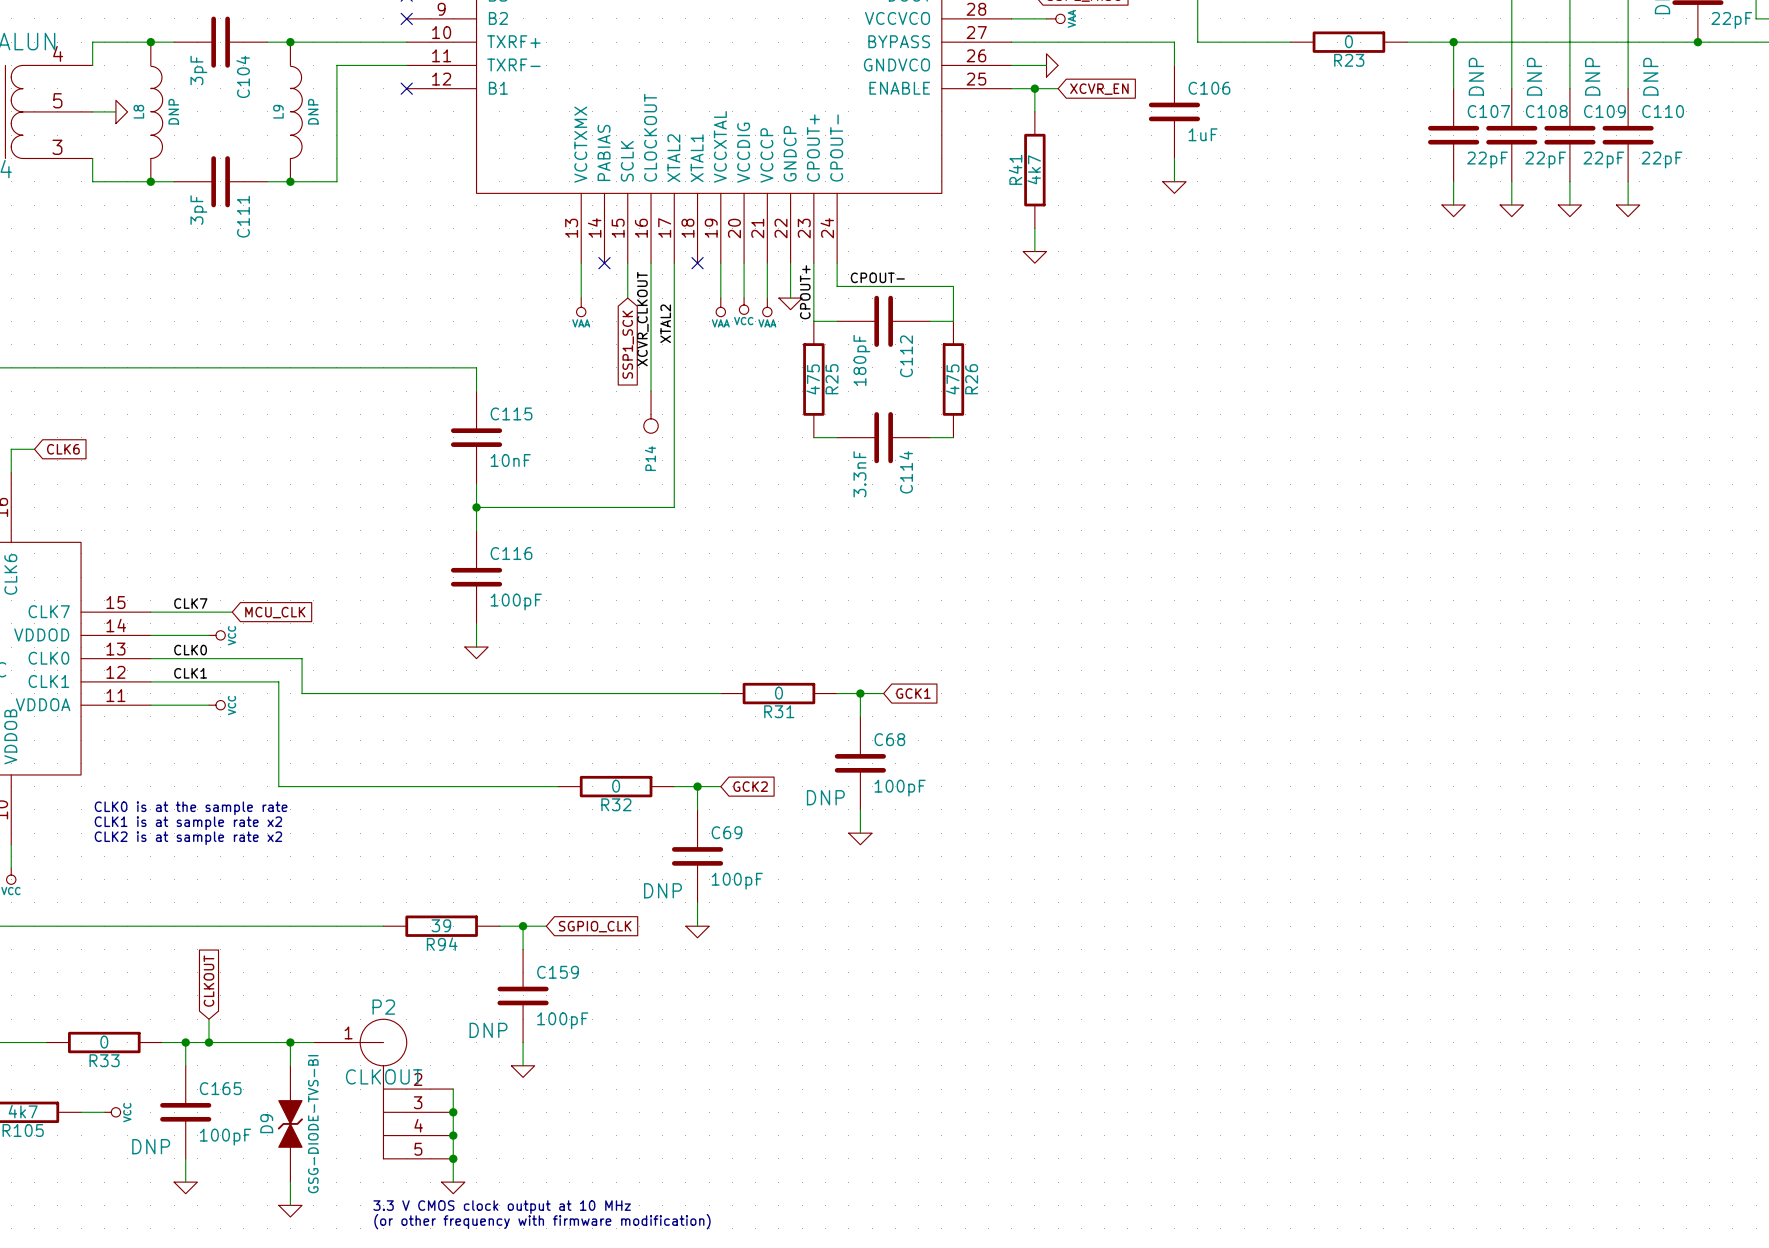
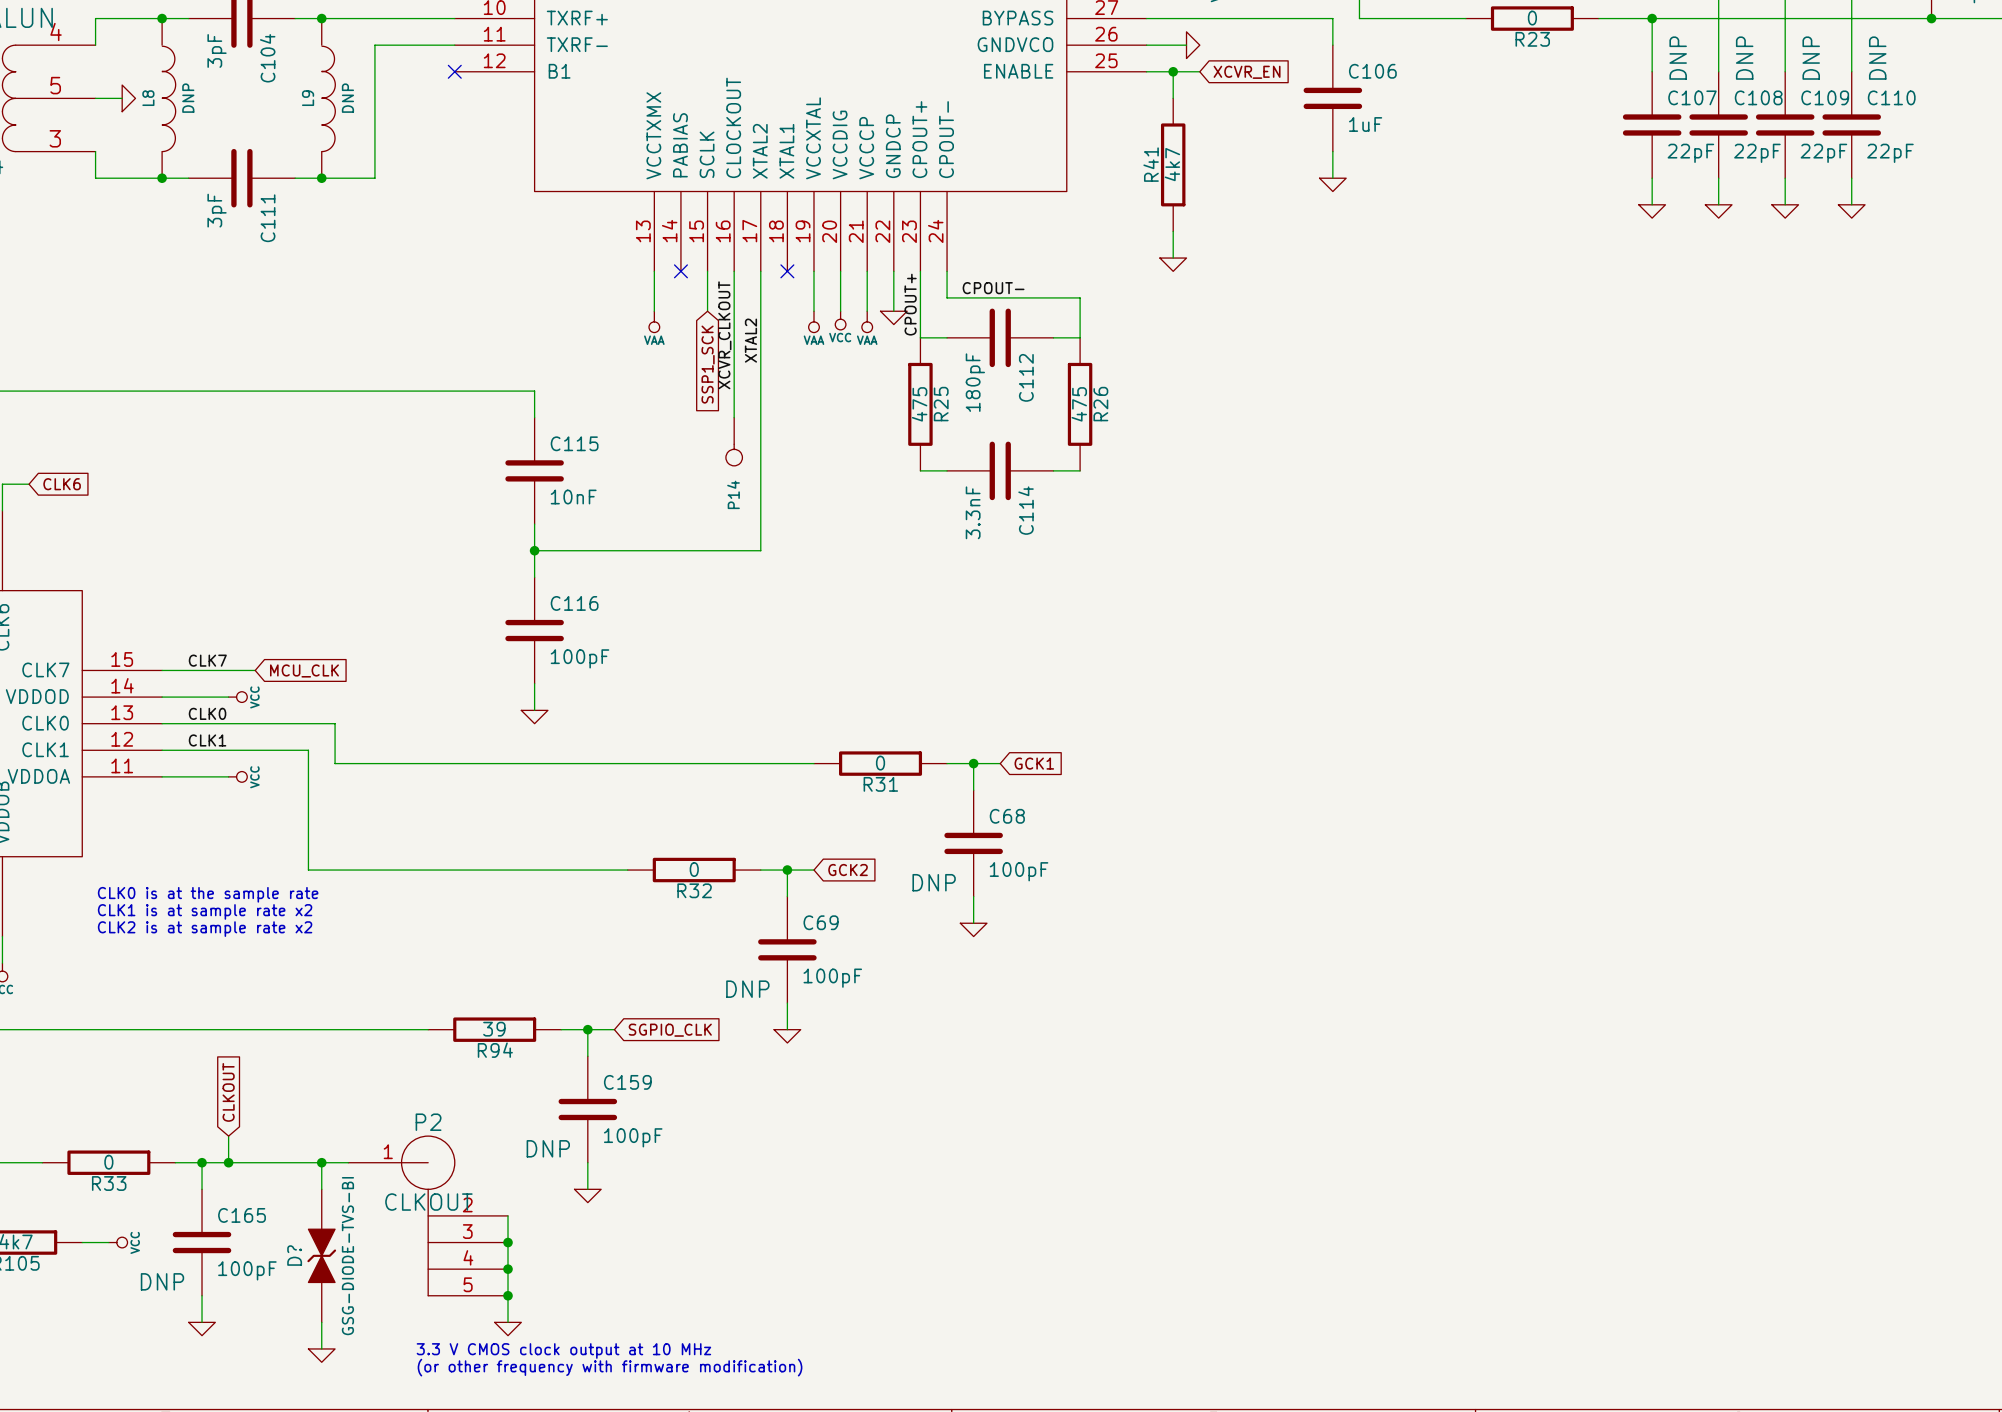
D9 name: D9 (266, 1123) -> D? (294, 1255)

